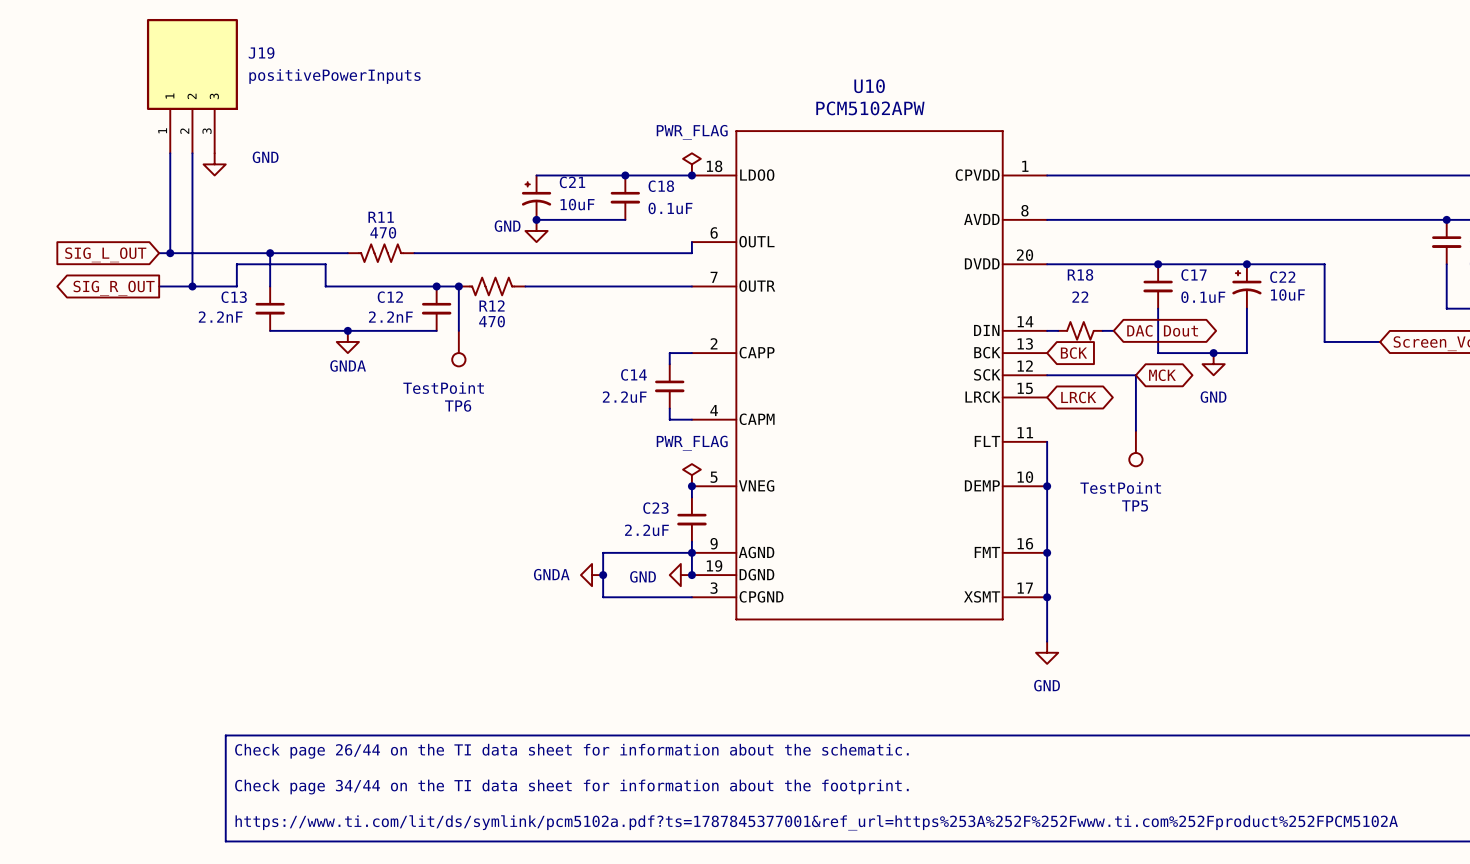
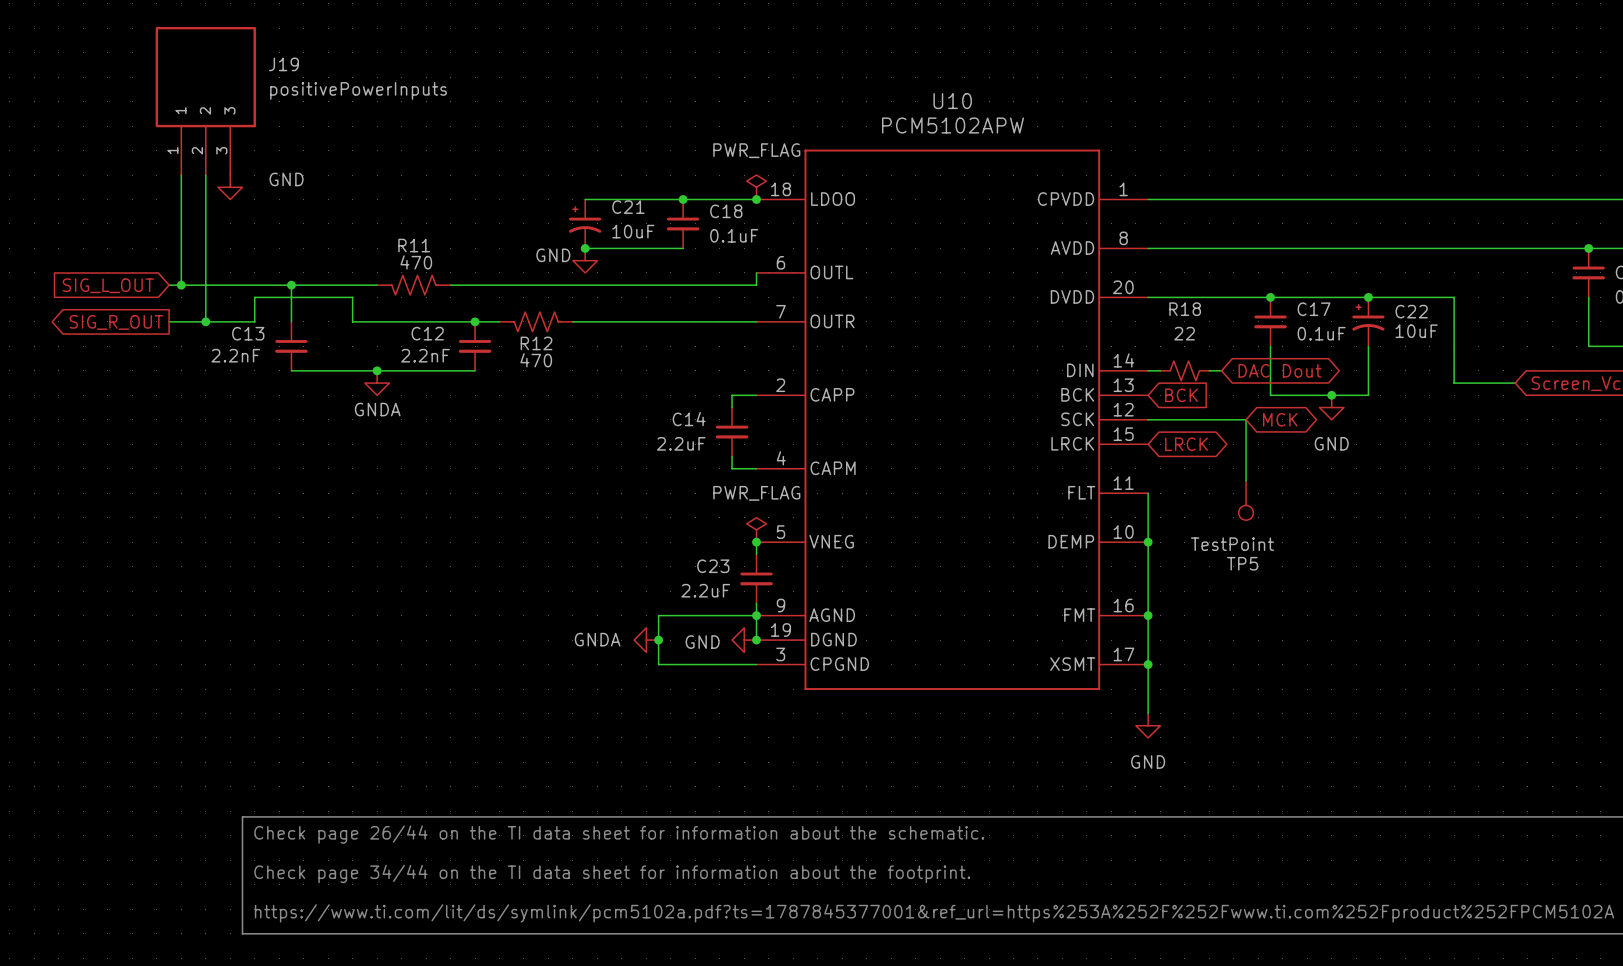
wire: (458, 286) (458, 330) -> none
junction: (458, 286) -> none
TP6: TestPoint (458, 348) -> none

